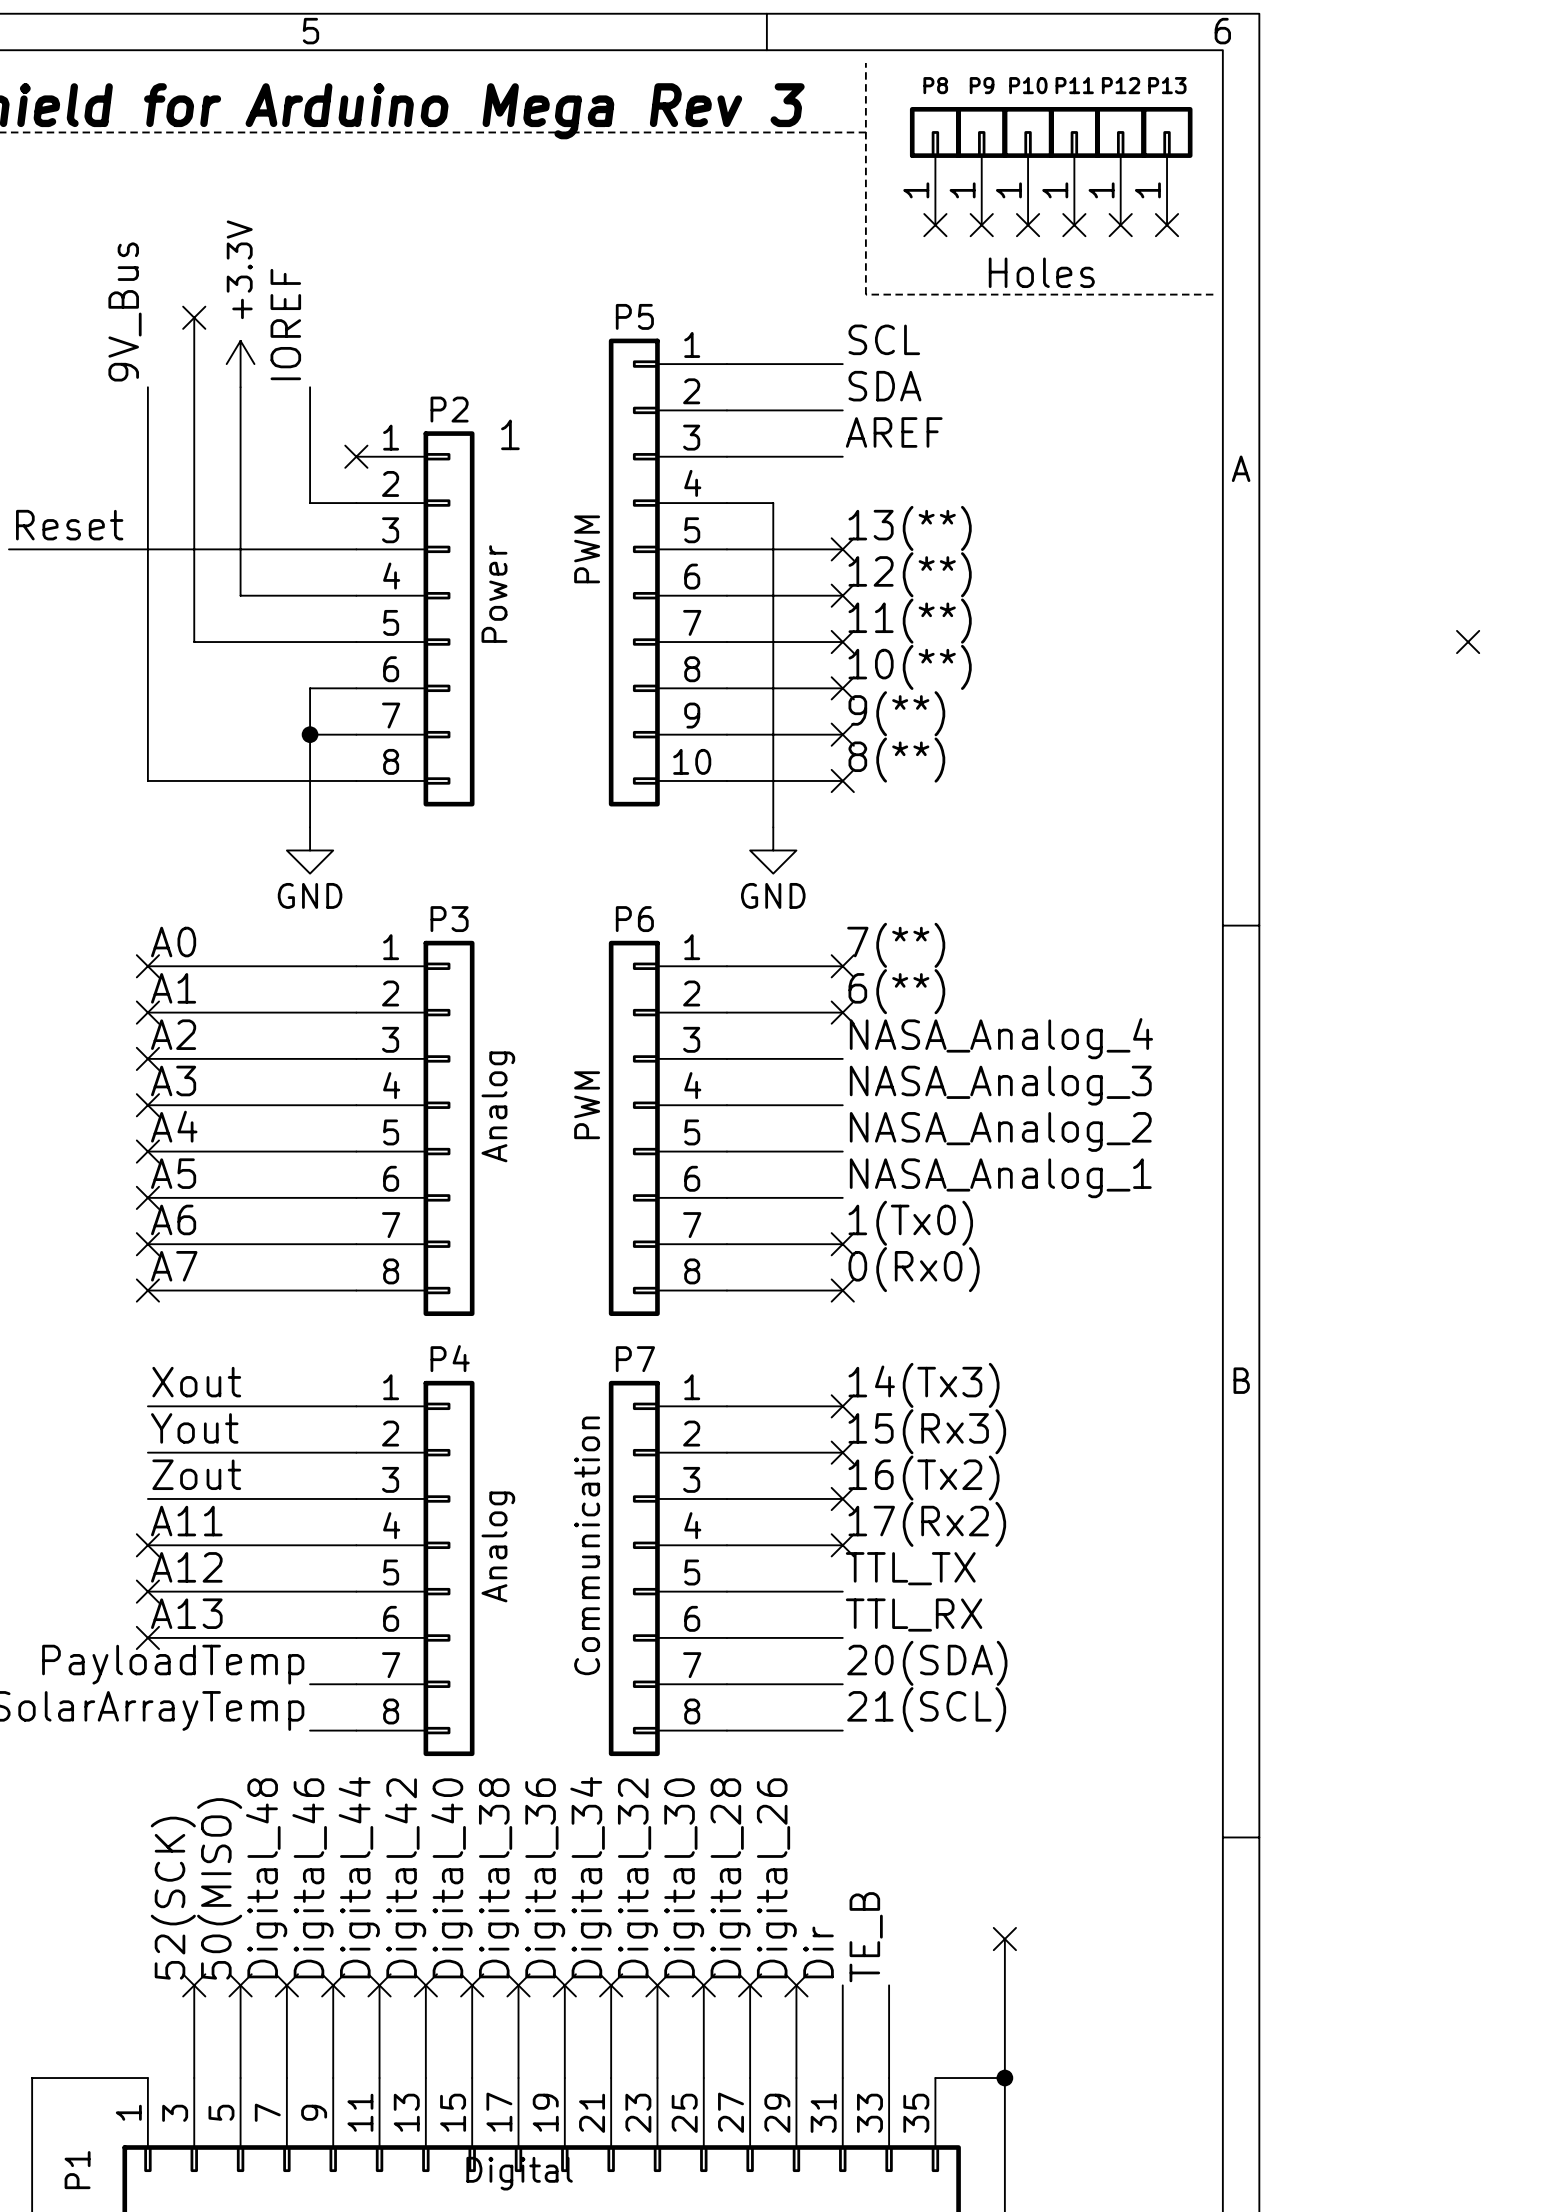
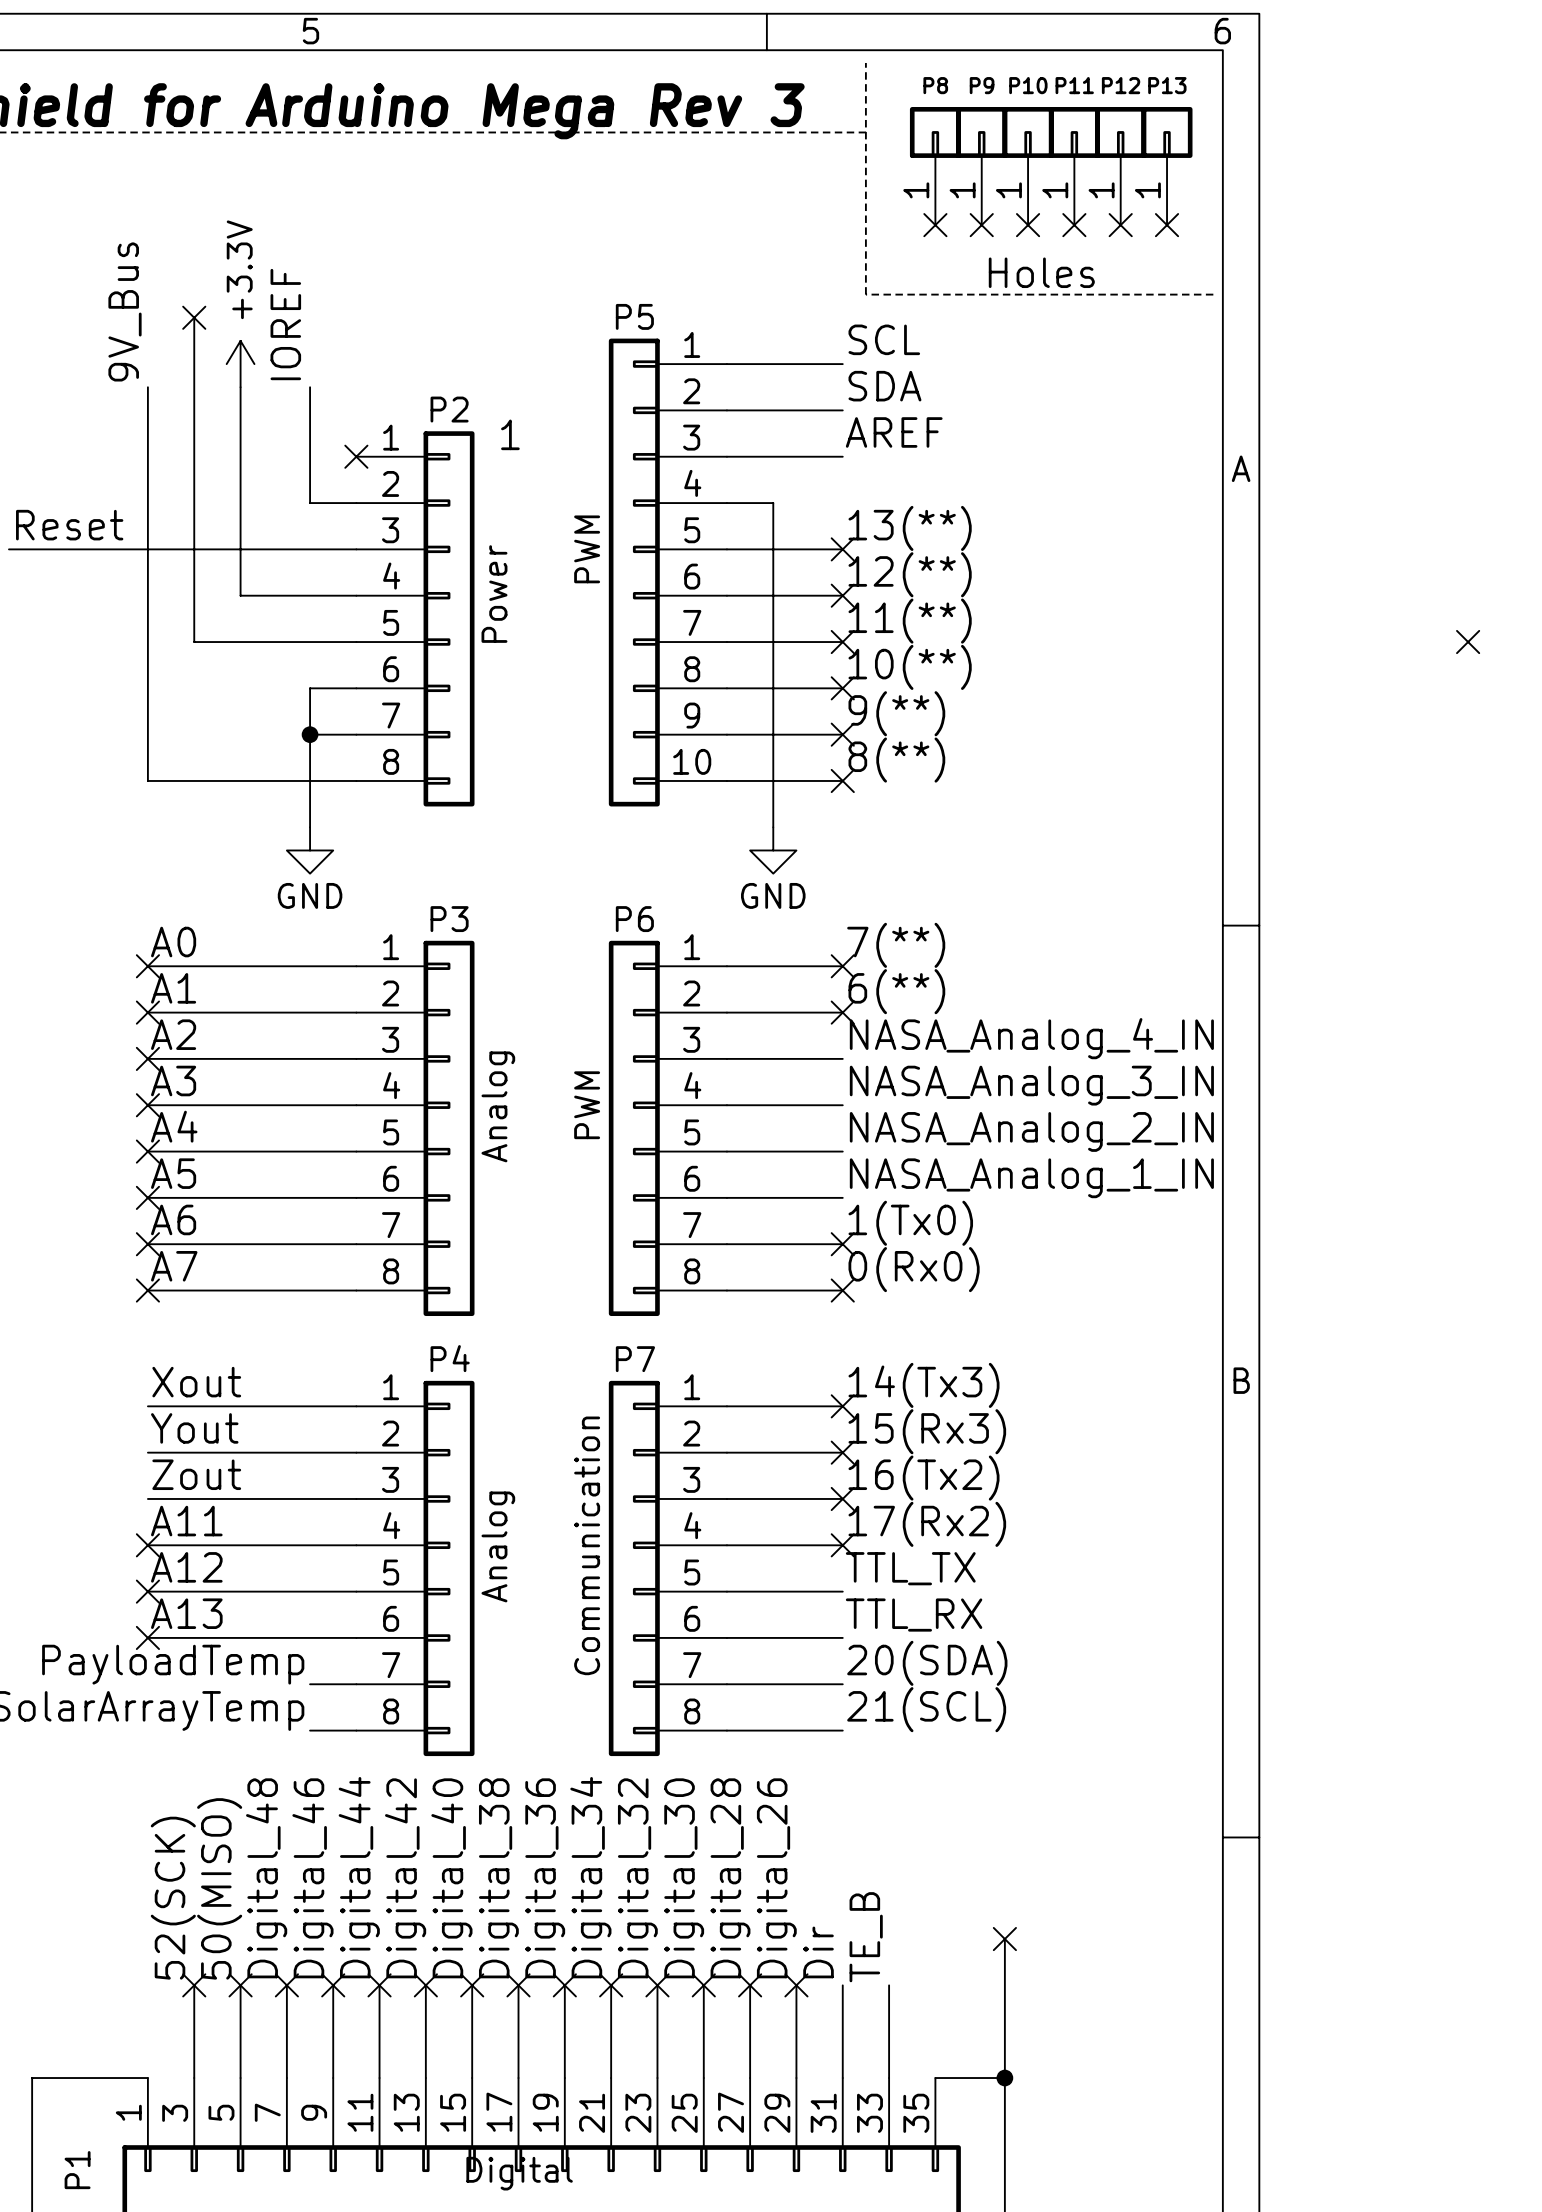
label: NASA_Analog_4 (1001, 1038) -> NASA_Analog_4_IN (1031, 1038)
label: NASA_Analog_3 (1000, 1085) -> NASA_Analog_3_IN (1031, 1085)
label: NASA_Analog_2 (1000, 1131) -> NASA_Analog_2_IN (1031, 1131)
label: NASA_Analog_1 (1000, 1178) -> NASA_Analog_1_IN (1031, 1178)

